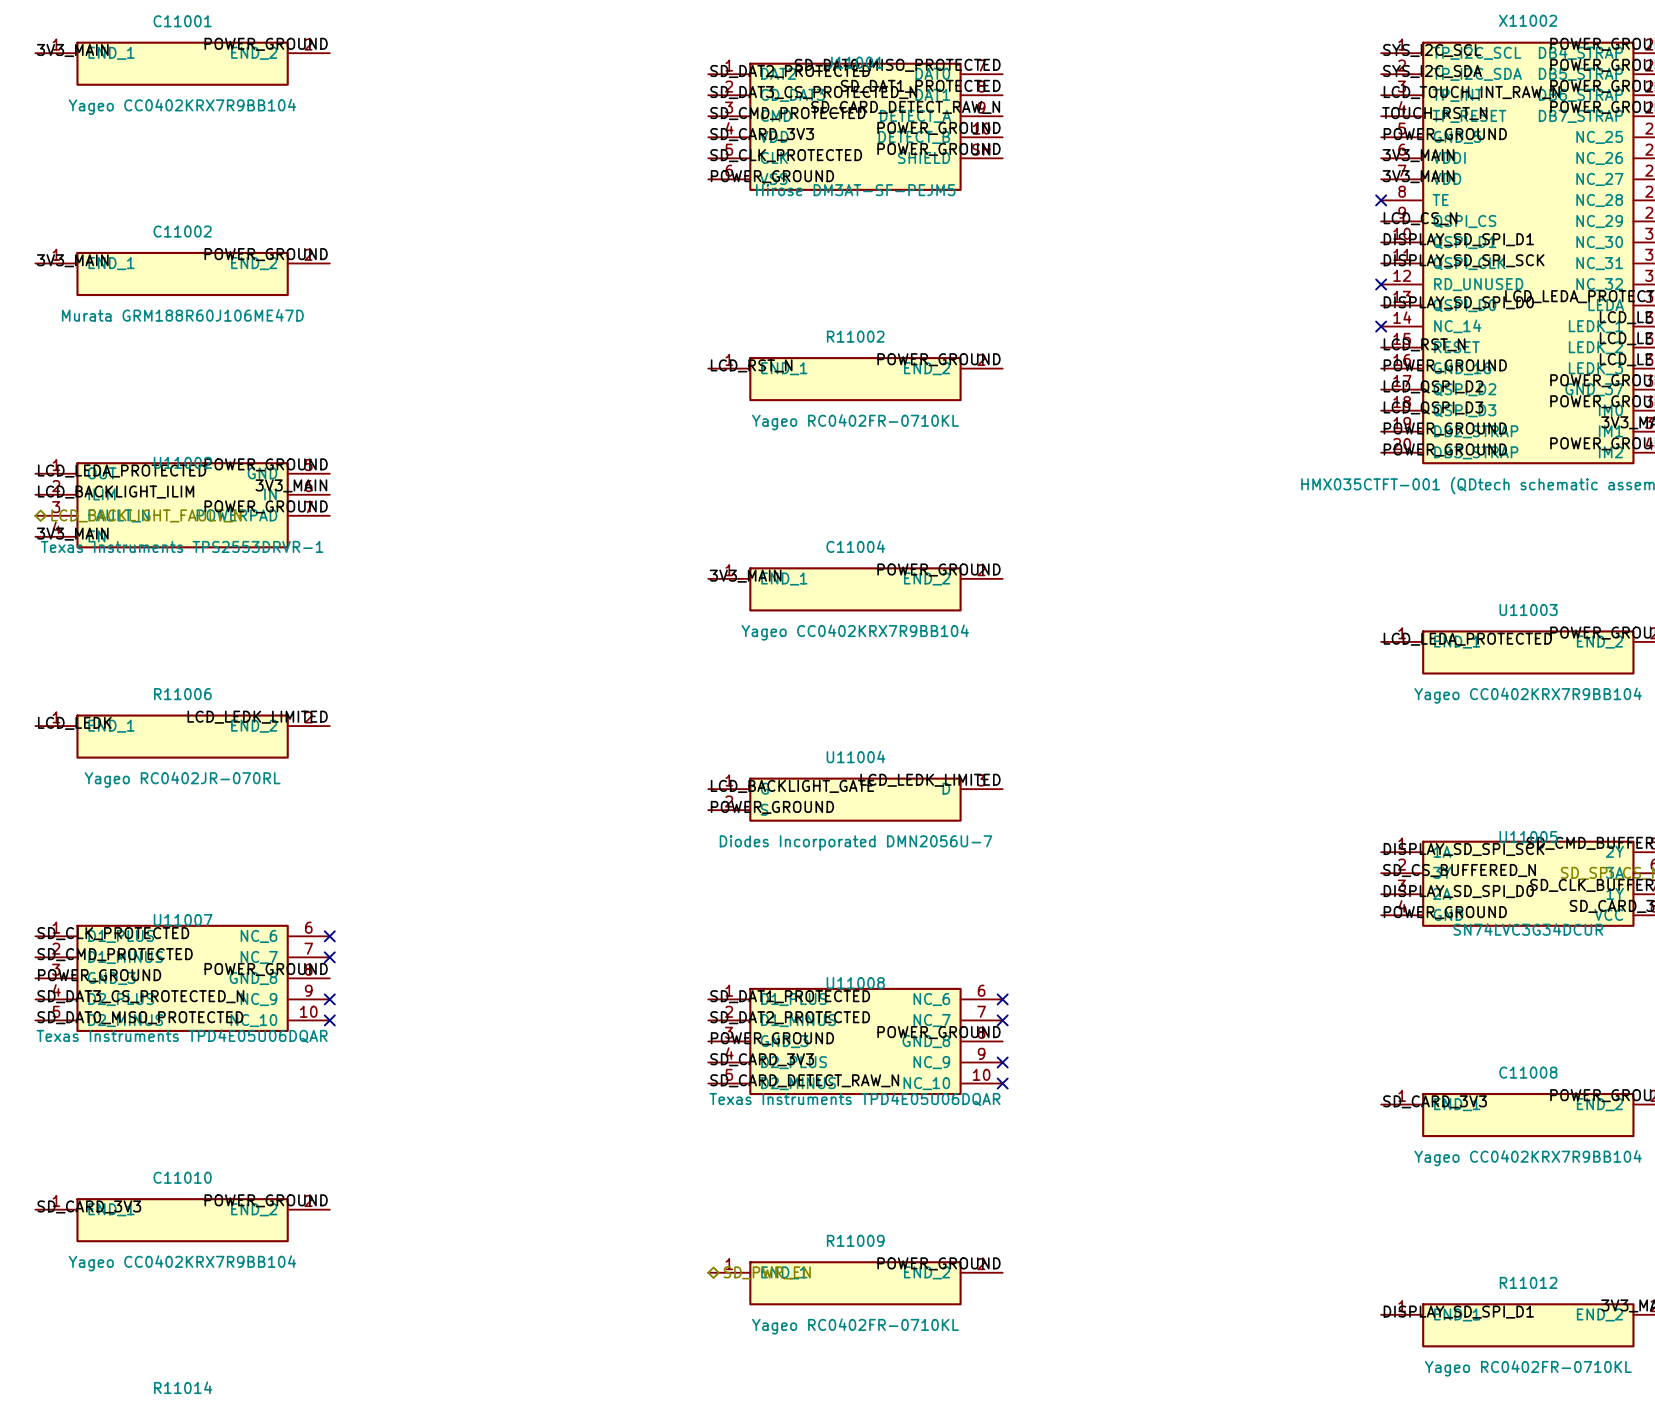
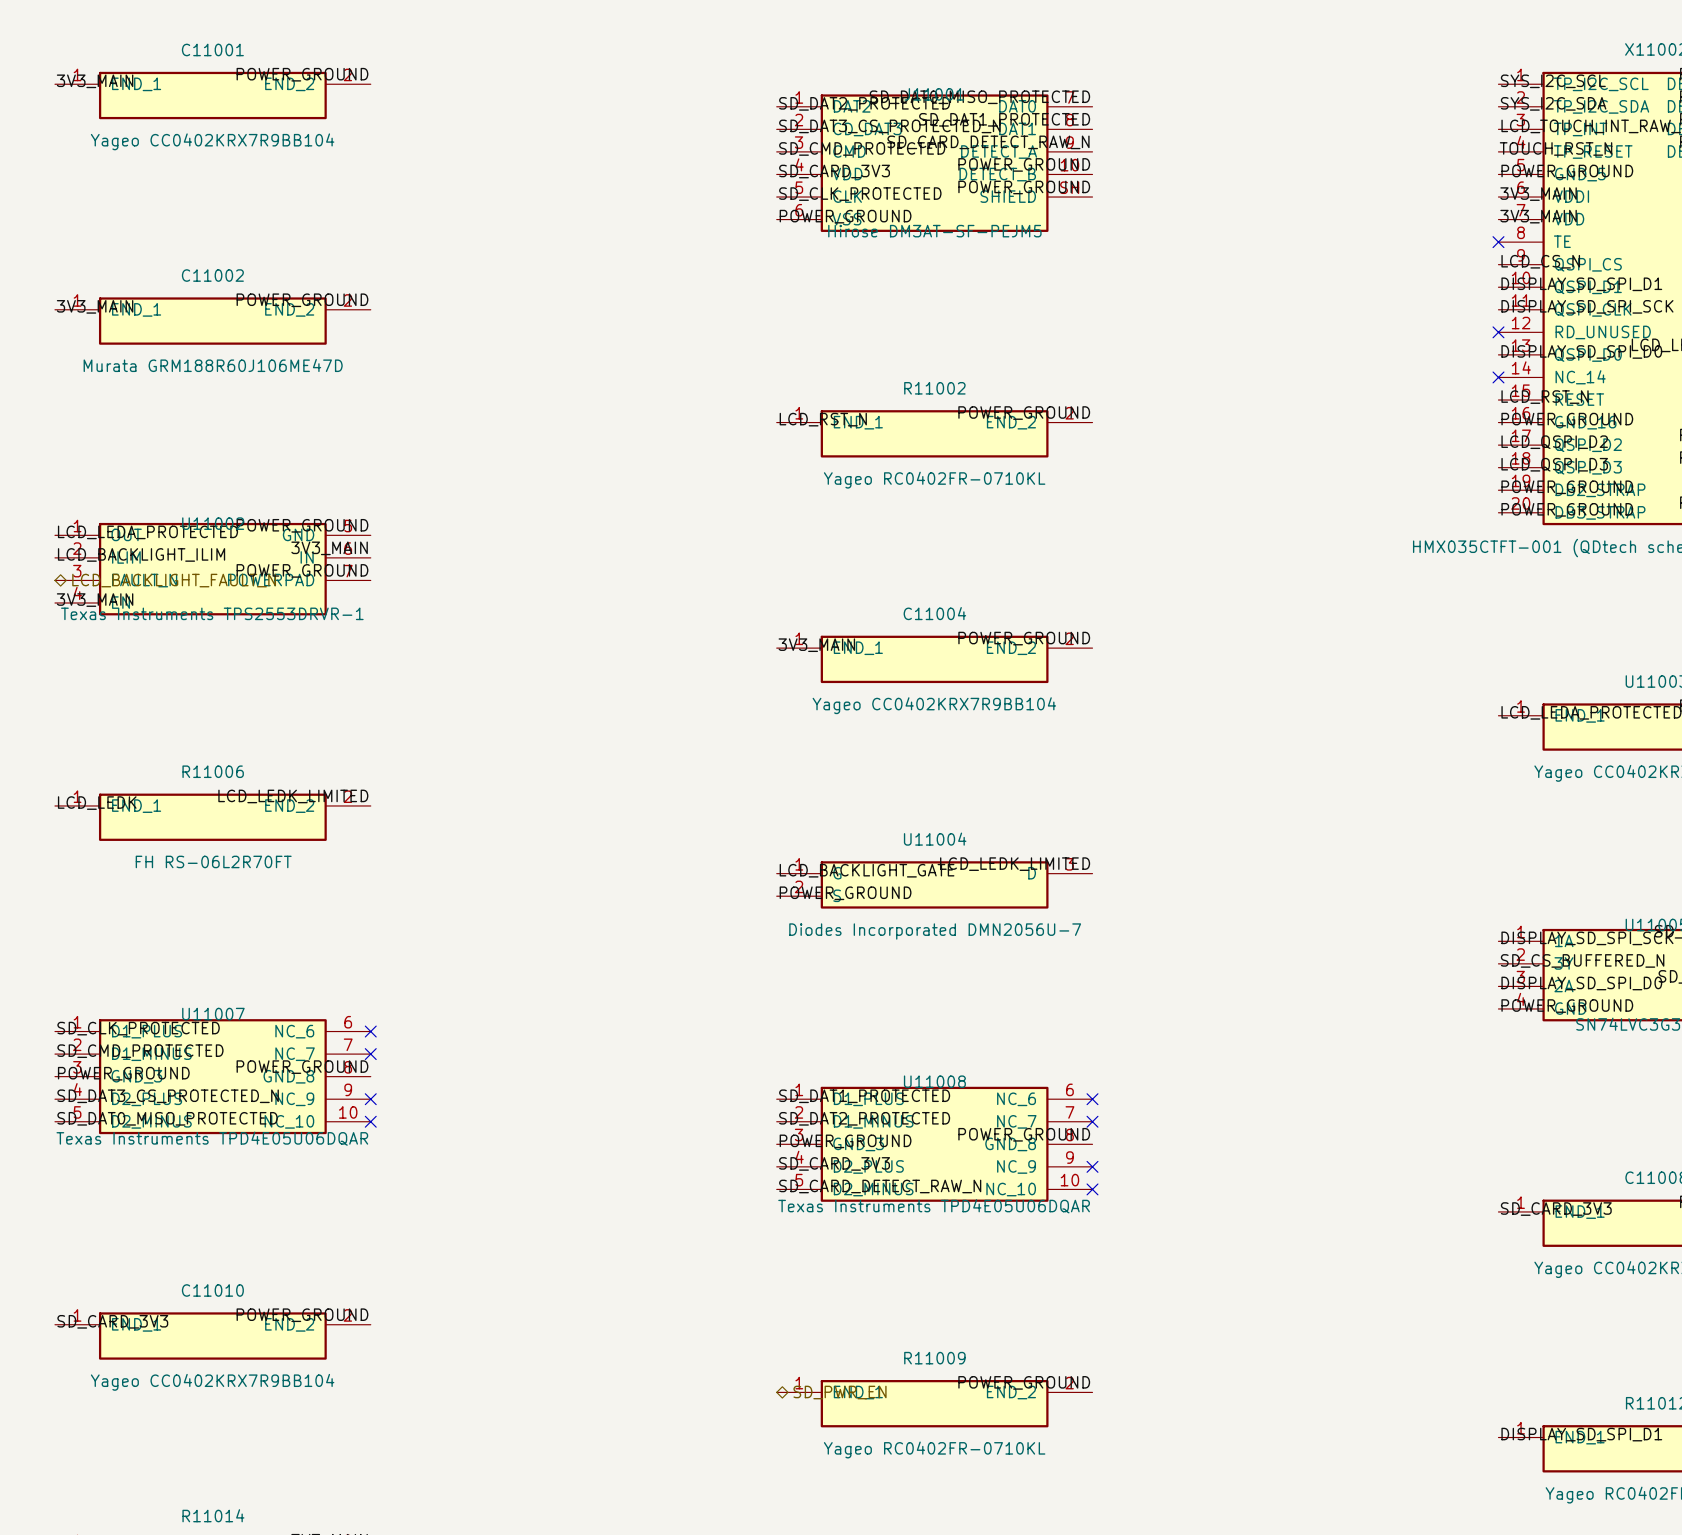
R11006 value: Yageo RC0402JR-070RL (182, 779) -> FH RS-06L2R70FT (213, 861)

